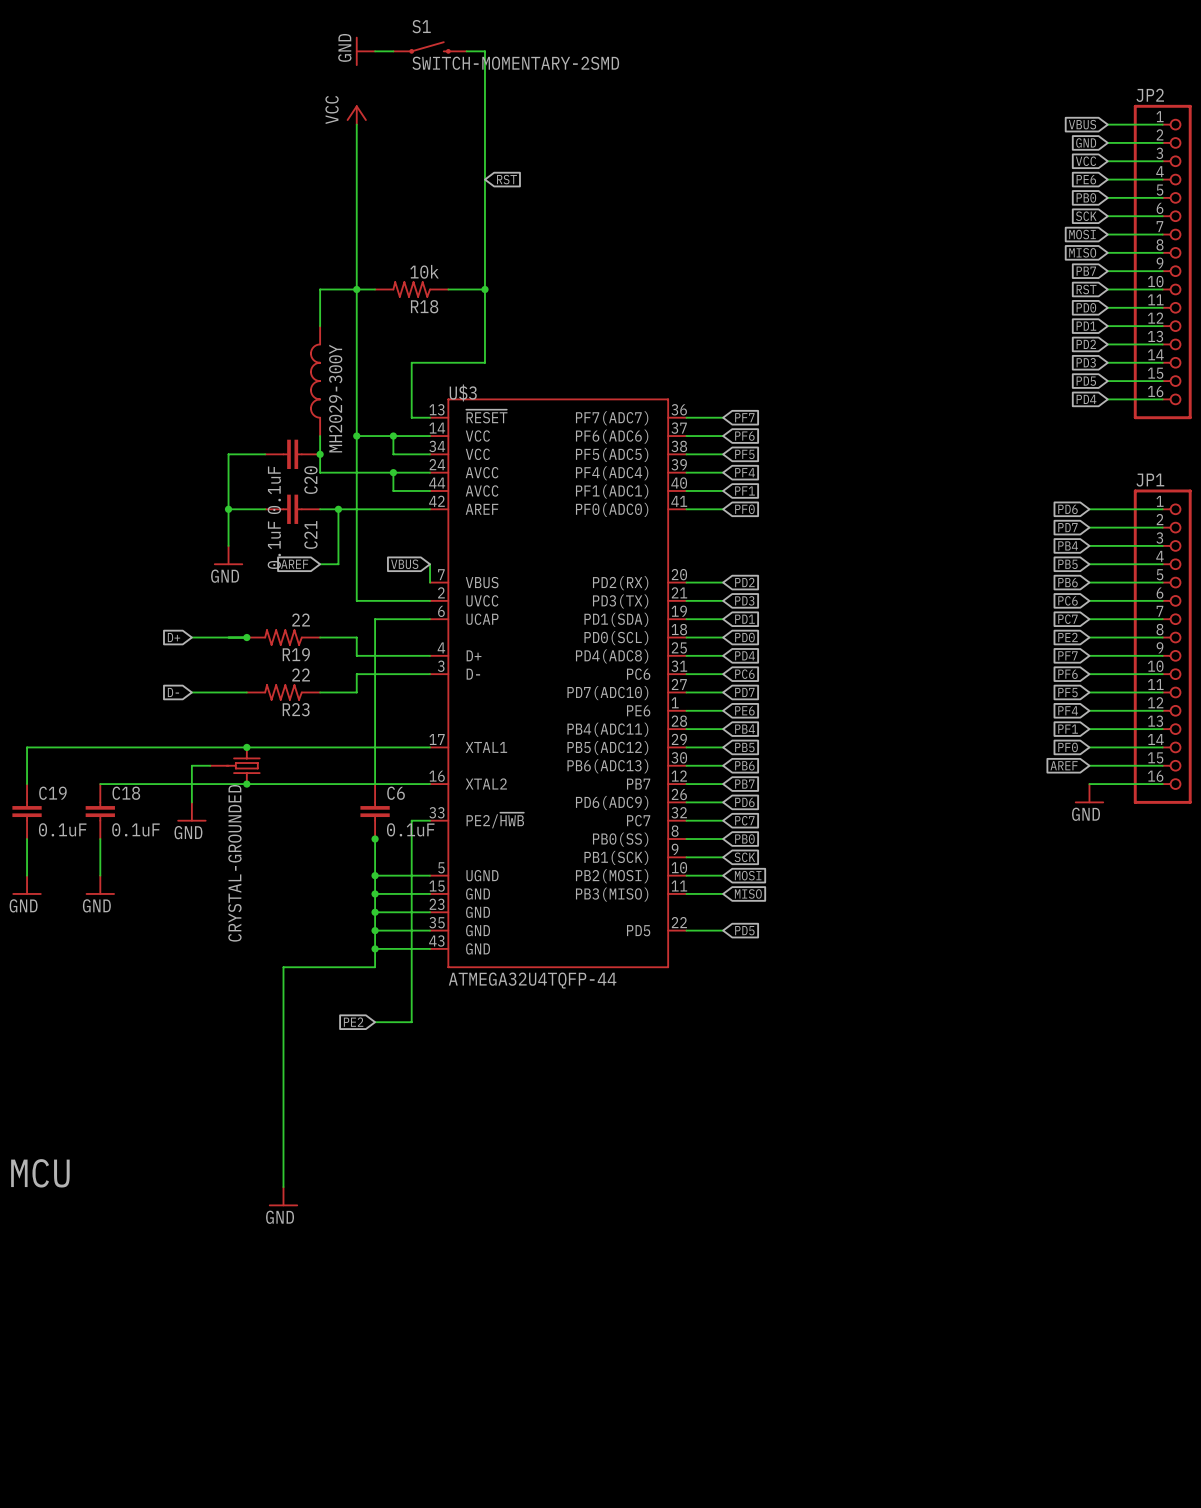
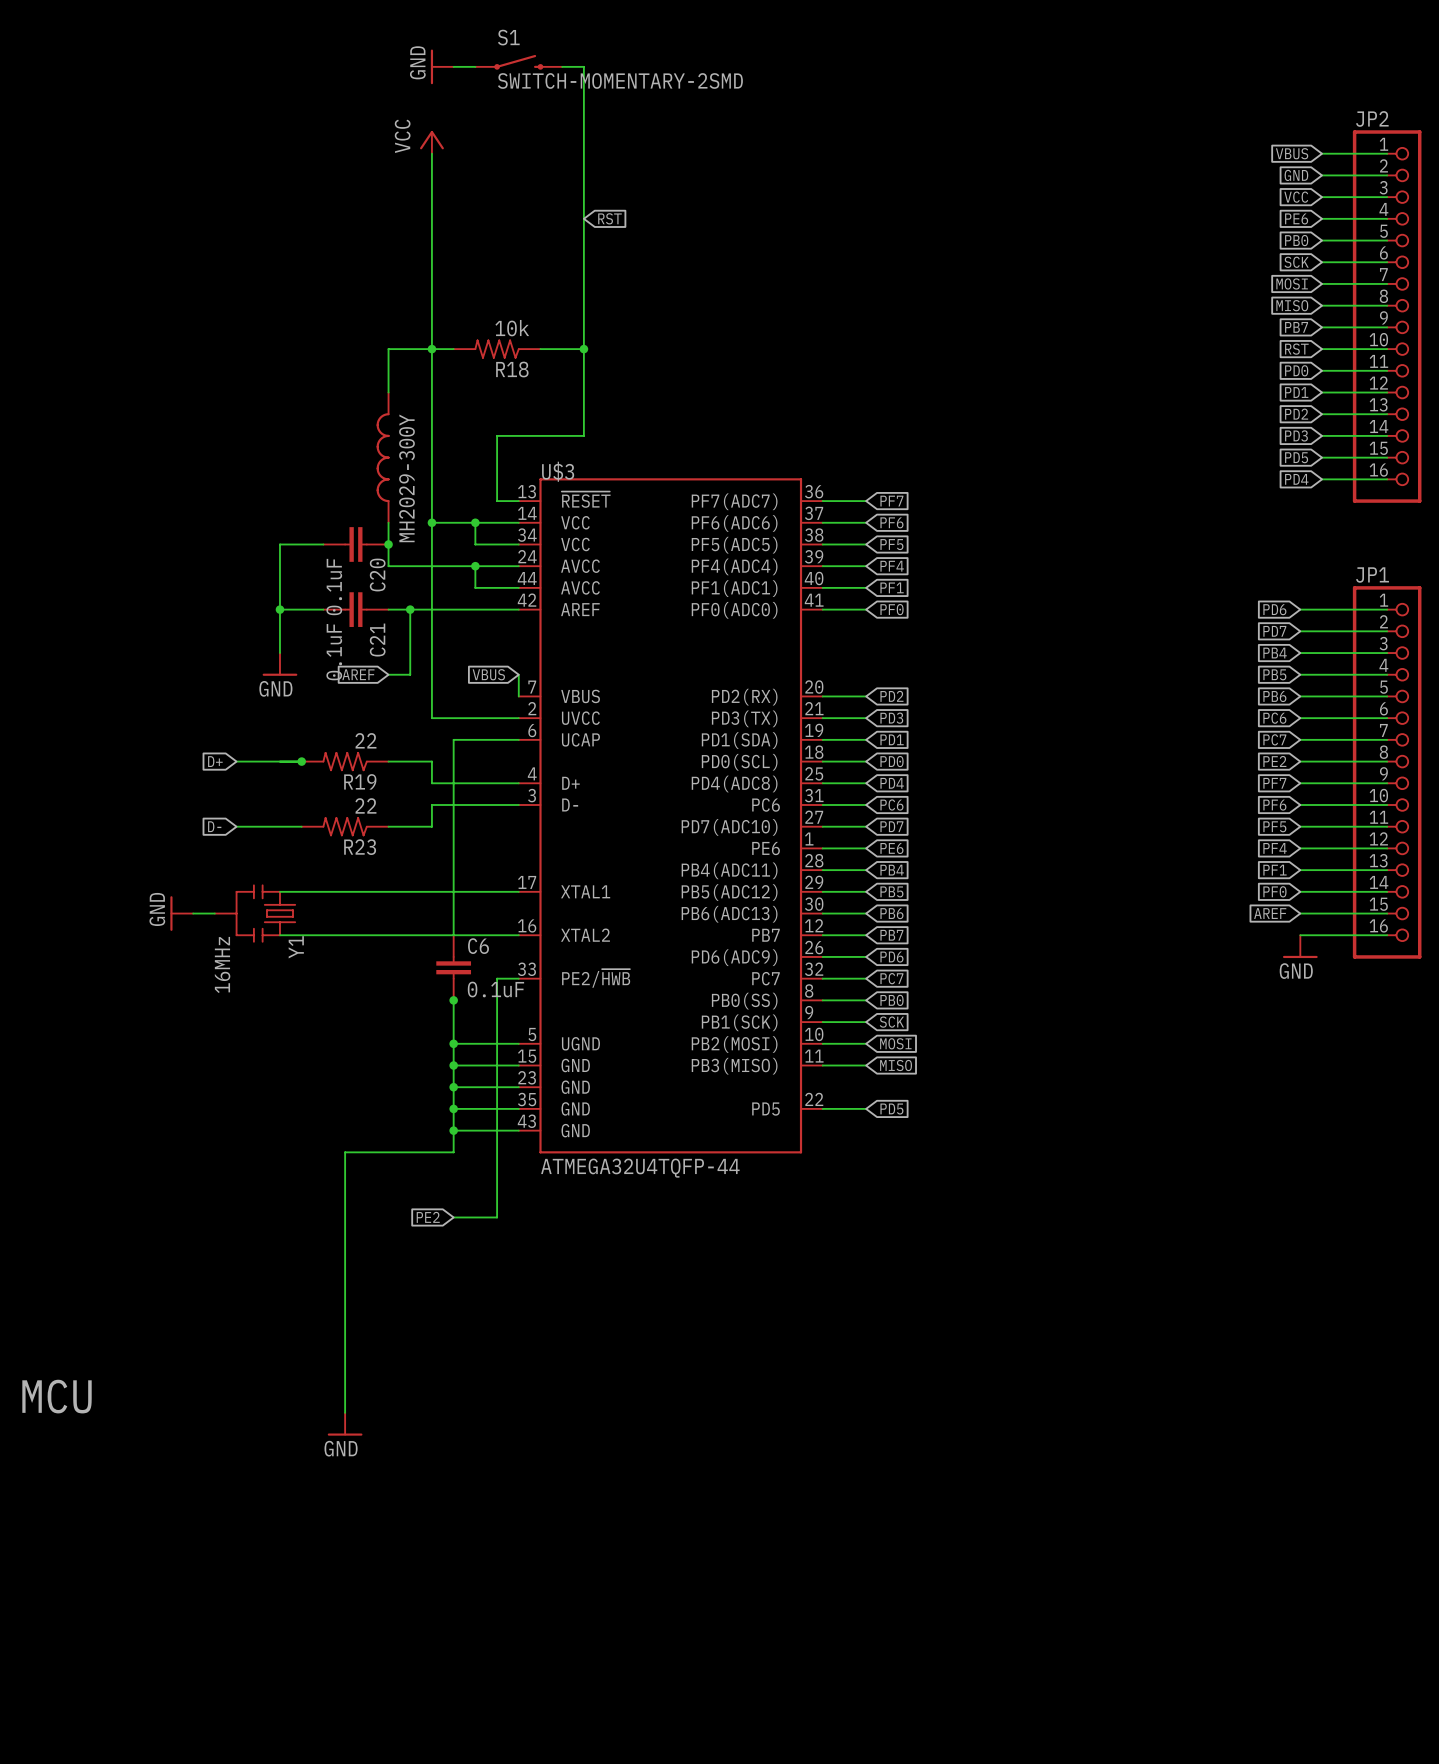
wire: (228, 747) (27, 747) (27, 784) -> none
junction: (246, 747) -> none
power symbol: none -> GND (181, 913)
wire: none -> (193, 913) (214, 913)
Y1: none -> 16MHz (255, 913)
wire: (210, 765) (191, 765) (191, 802) -> none
part: CRYSTAL-GROUNDED (235, 765) -> none
wire: (100, 784) (228, 784) -> none
junction: (246, 784) -> none
C19: 0.1uF (27, 811) -> none
C18: 0.1uF (100, 811) -> none
power symbol: GND (191, 812) -> none
wire: (27, 839) (27, 875) -> none
wire: (100, 839) (100, 875) -> none
power symbol: GND (27, 885) -> none
power symbol: GND (100, 885) -> none

